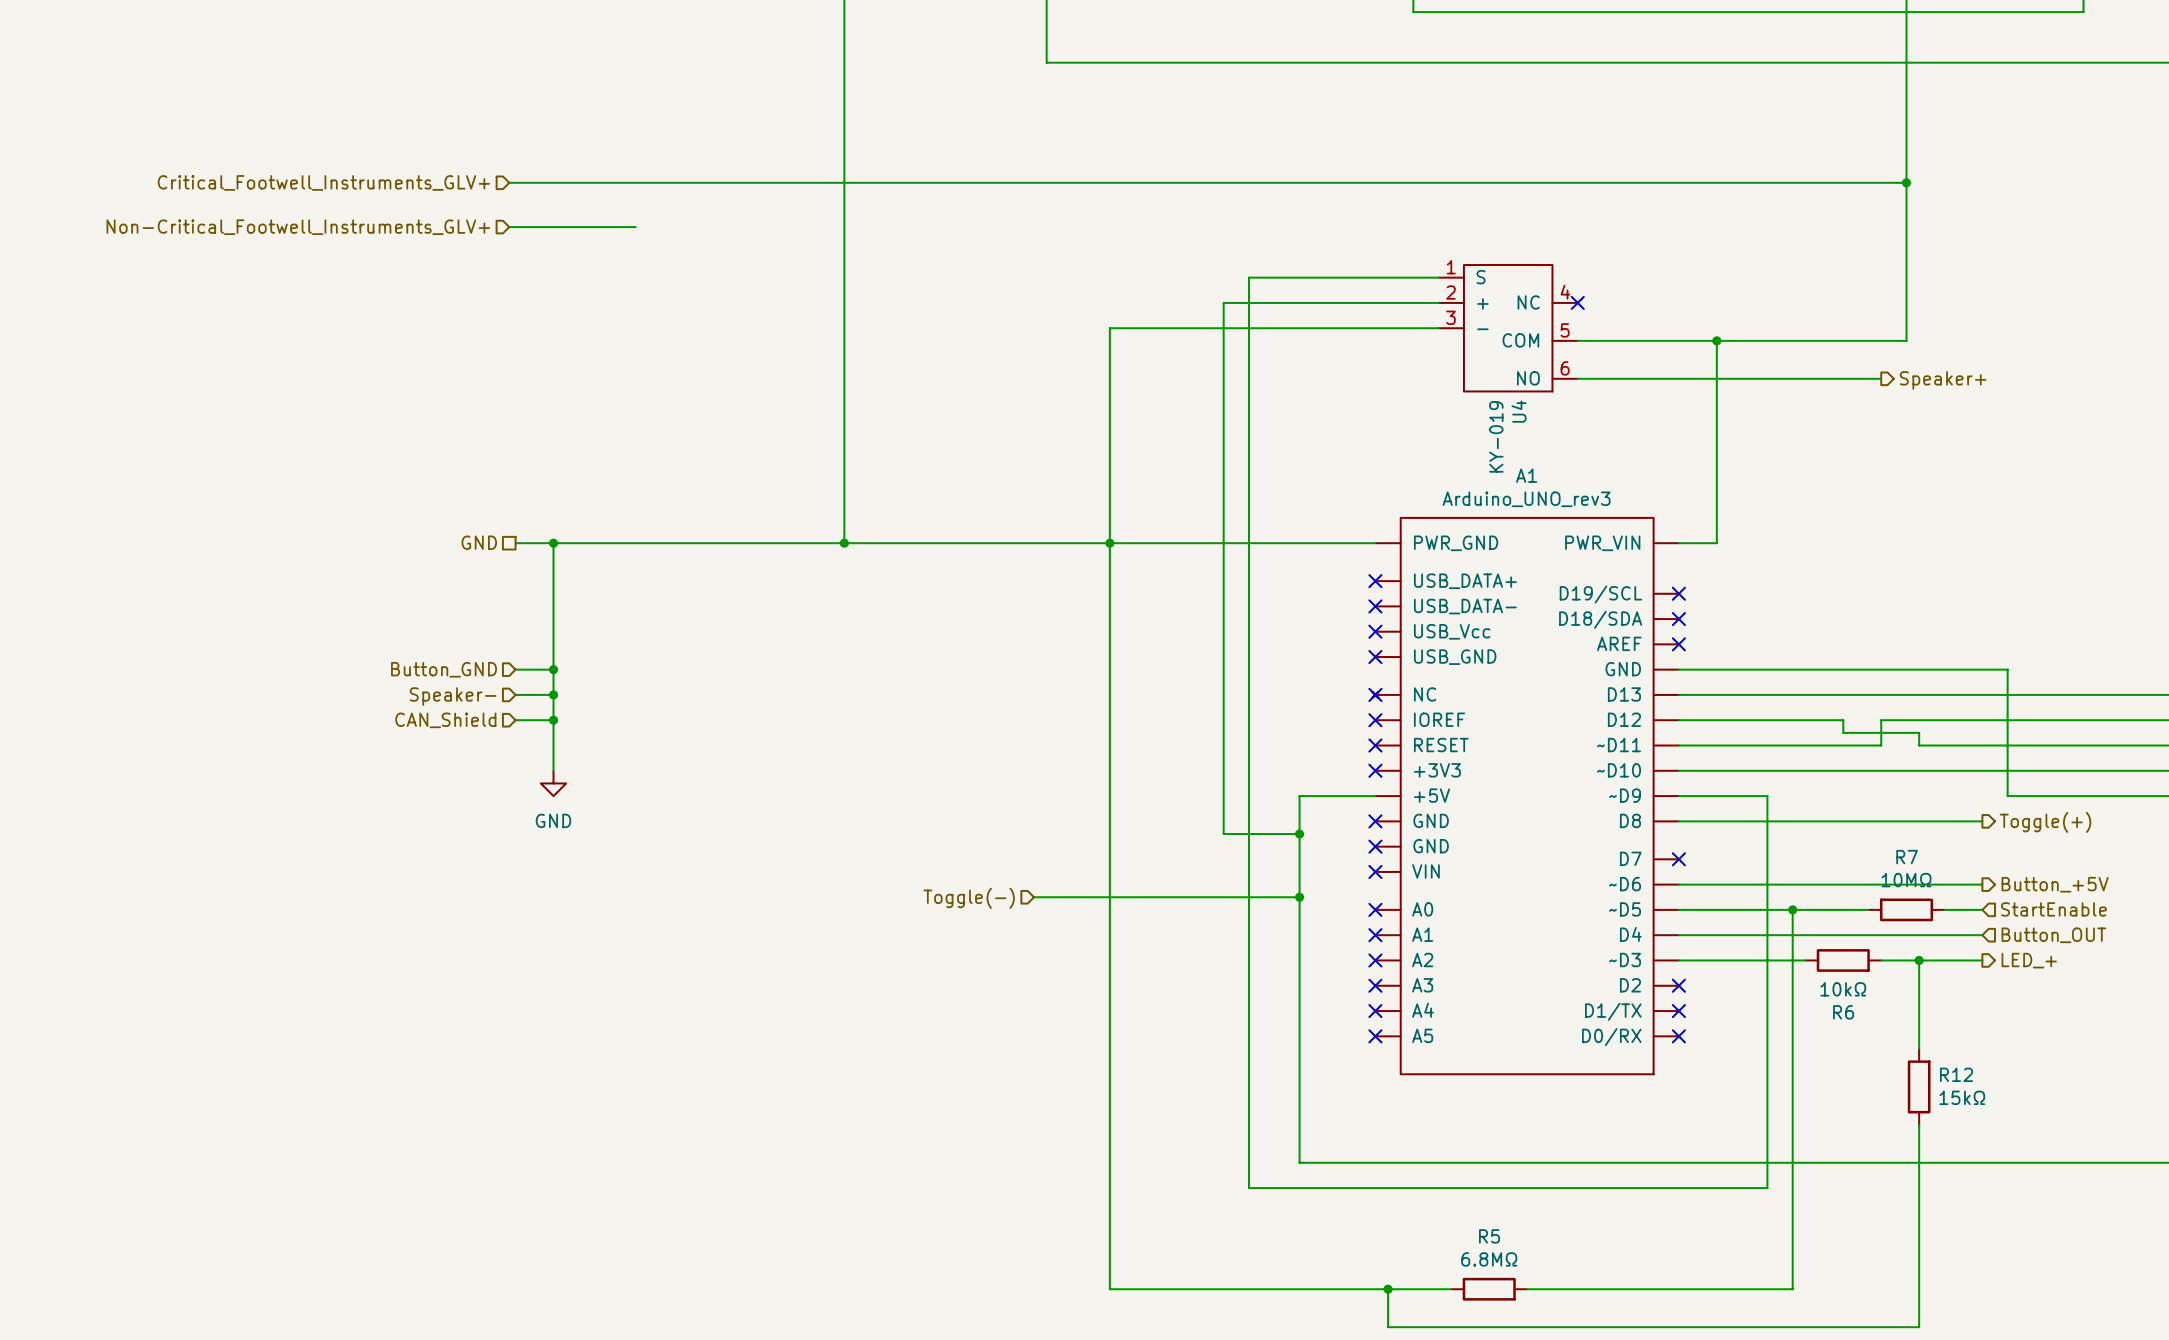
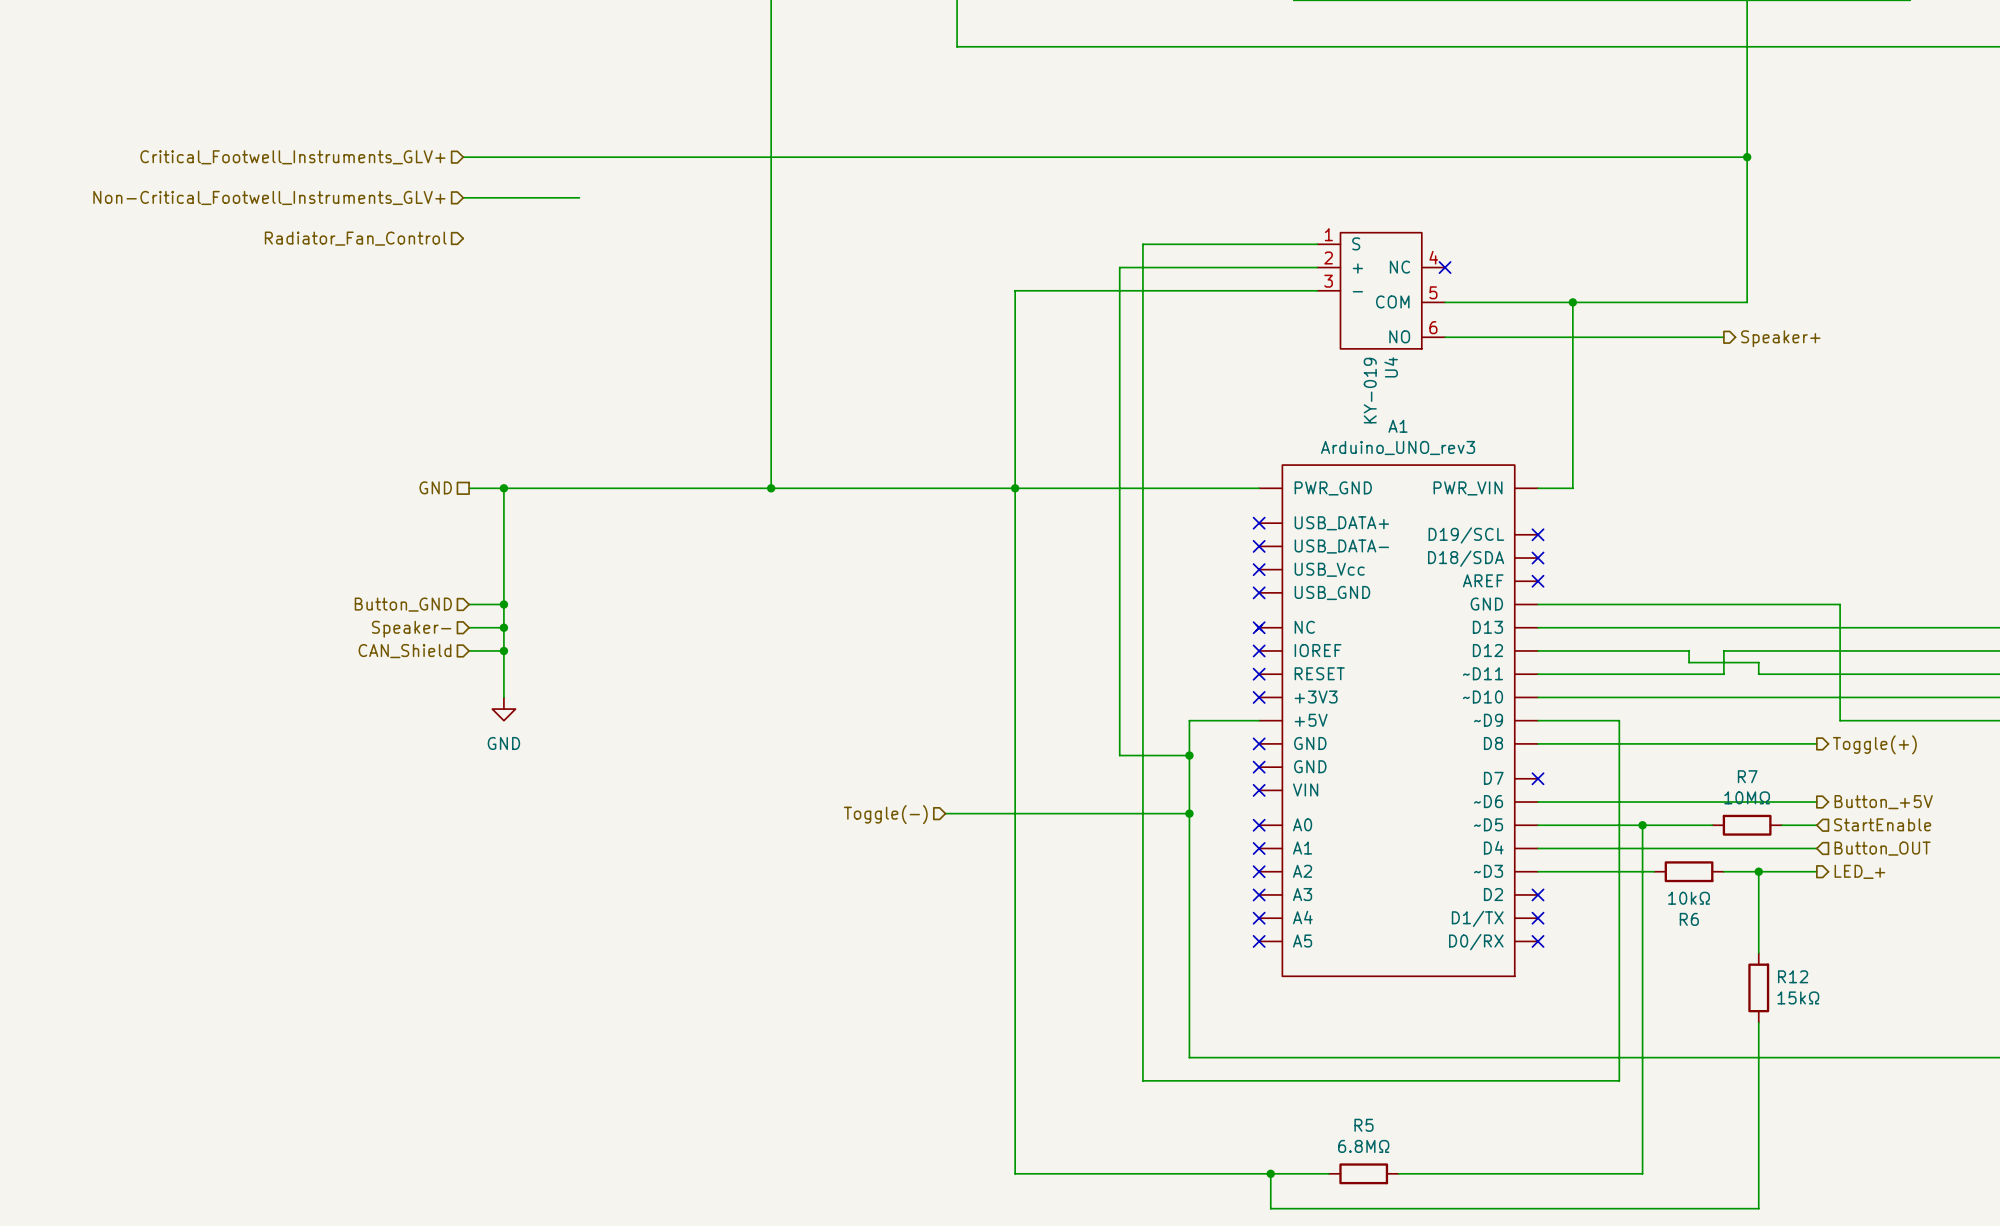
hierarchical label: none -> Radiator_Fan_Control (355, 238)

